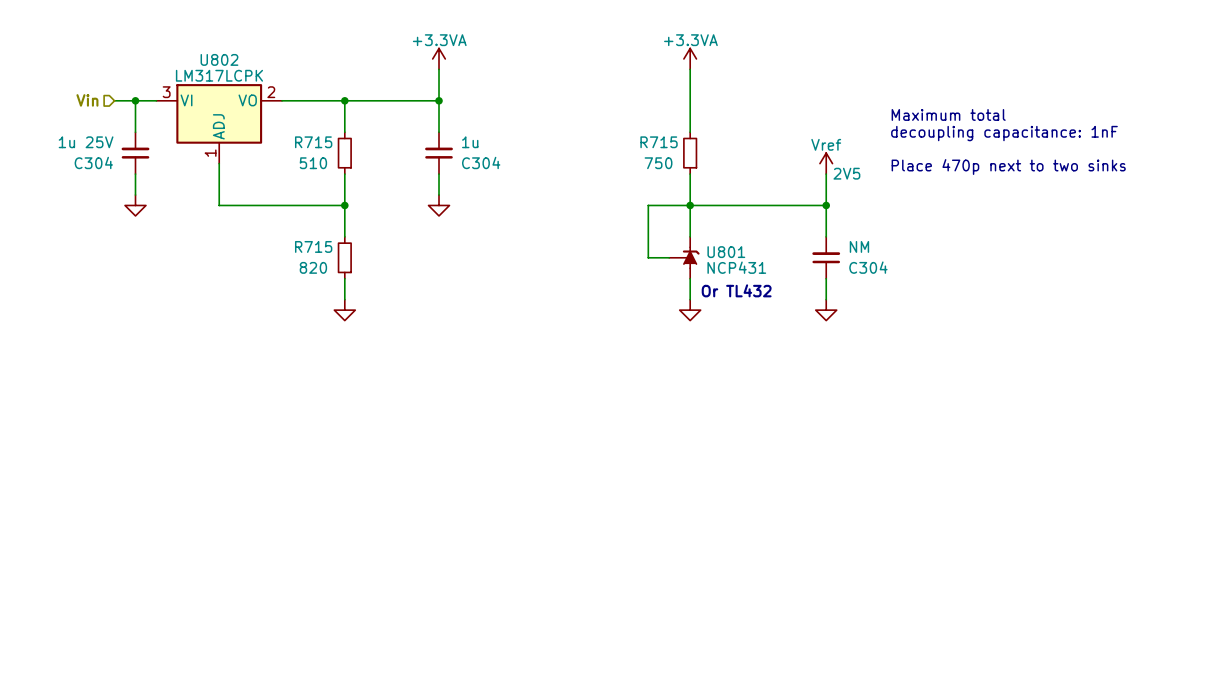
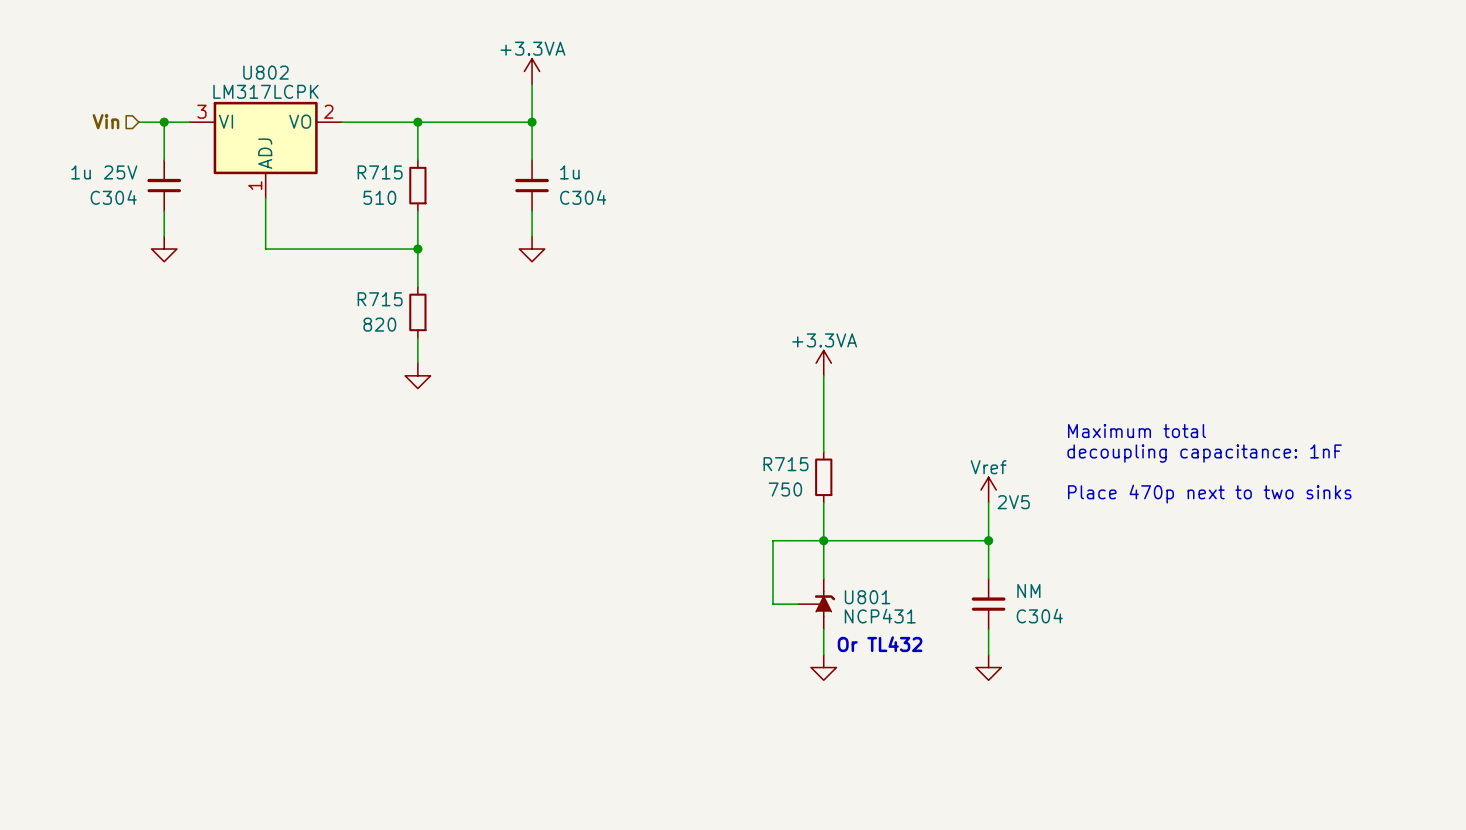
power symbol: +3.3VA (690, 58) -> none
wire: (690, 69) (690, 132) -> none
text: Maximum total (948, 114) -> none
text: decoupling capacitance: 1nF (1004, 133) -> none
R715: 750 (690, 153) -> none
power symbol: Vref (826, 163) -> none
text: Place 470p next to two sinks (1008, 167) -> none
wire: (690, 174) (690, 236) -> (823, 375) (823, 451)
wire: (826, 174) (826, 236) -> none
junction: (690, 205) -> none
wire: (826, 205) (648, 205) (648, 257) (669, 257) -> none
junction: (826, 205) -> none
U801 position: (684, 257) -> (816, 604)
C304: NM (826, 257) -> none
wire: (690, 278) (690, 299) -> none
wire: (826, 278) (826, 299) -> none
text: Or TL432 (736, 290) -> none
power symbol: none -> +3.3VA (823, 363)
power symbol: (690, 310) -> none
power symbol: (826, 310) -> none
text: none -> Maximum total (1136, 431)
text: none -> decoupling capacitance: 1nF (1204, 453)
R715: none -> 750 (823, 477)
power symbol: none -> Vref (988, 489)
text: none -> Place 470p next to two sinks (1209, 494)
wire: none -> (823, 502) (823, 578)
wire: none -> (988, 502) (988, 578)
junction: none -> (823, 540)
wire: none -> (988, 540) (773, 540) (773, 604) (798, 604)
junction: none -> (988, 540)
C304: none -> NM (988, 604)
wire: none -> (823, 629) (823, 654)
wire: none -> (988, 629) (988, 654)
text: none -> Or TL432 (880, 644)
power symbol: none -> (823, 667)
power symbol: none -> (988, 667)

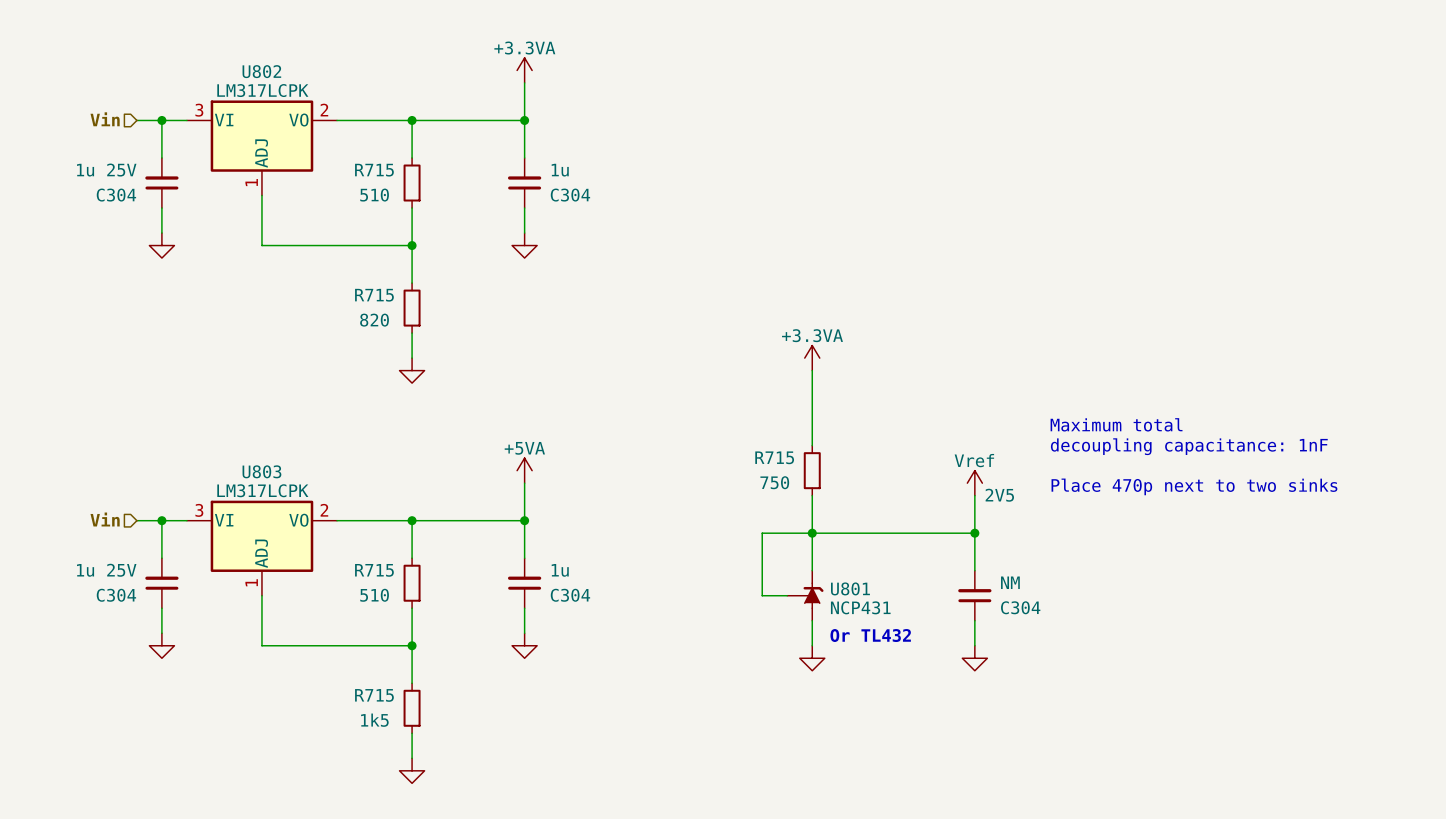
power symbol: none -> +5VA (524, 470)
wire: none -> (524, 483) (524, 558)
hierarchical label: none -> Vin (105, 519)
wire: none -> (136, 520) (186, 520)
wire: none -> (161, 520) (161, 558)
junction: none -> (161, 520)
wire: none -> (337, 520) (524, 520)
wire: none -> (412, 520) (412, 558)
junction: none -> (412, 520)
junction: none -> (524, 520)
U803: none -> LM317LCPK (261, 548)
C304: none -> 1u 25V (161, 583)
R715: none -> 510 (412, 583)
C304: none -> 1u (524, 583)
wire: none -> (261, 595) (261, 645) (412, 645)
wire: none -> (161, 608) (161, 633)
wire: none -> (412, 608) (412, 683)
wire: none -> (524, 608) (524, 633)
power symbol: none -> (161, 645)
junction: none -> (412, 645)
power symbol: none -> (524, 645)
R715: none -> 1k5 (412, 708)
wire: none -> (412, 733) (412, 758)
power symbol: none -> (412, 770)

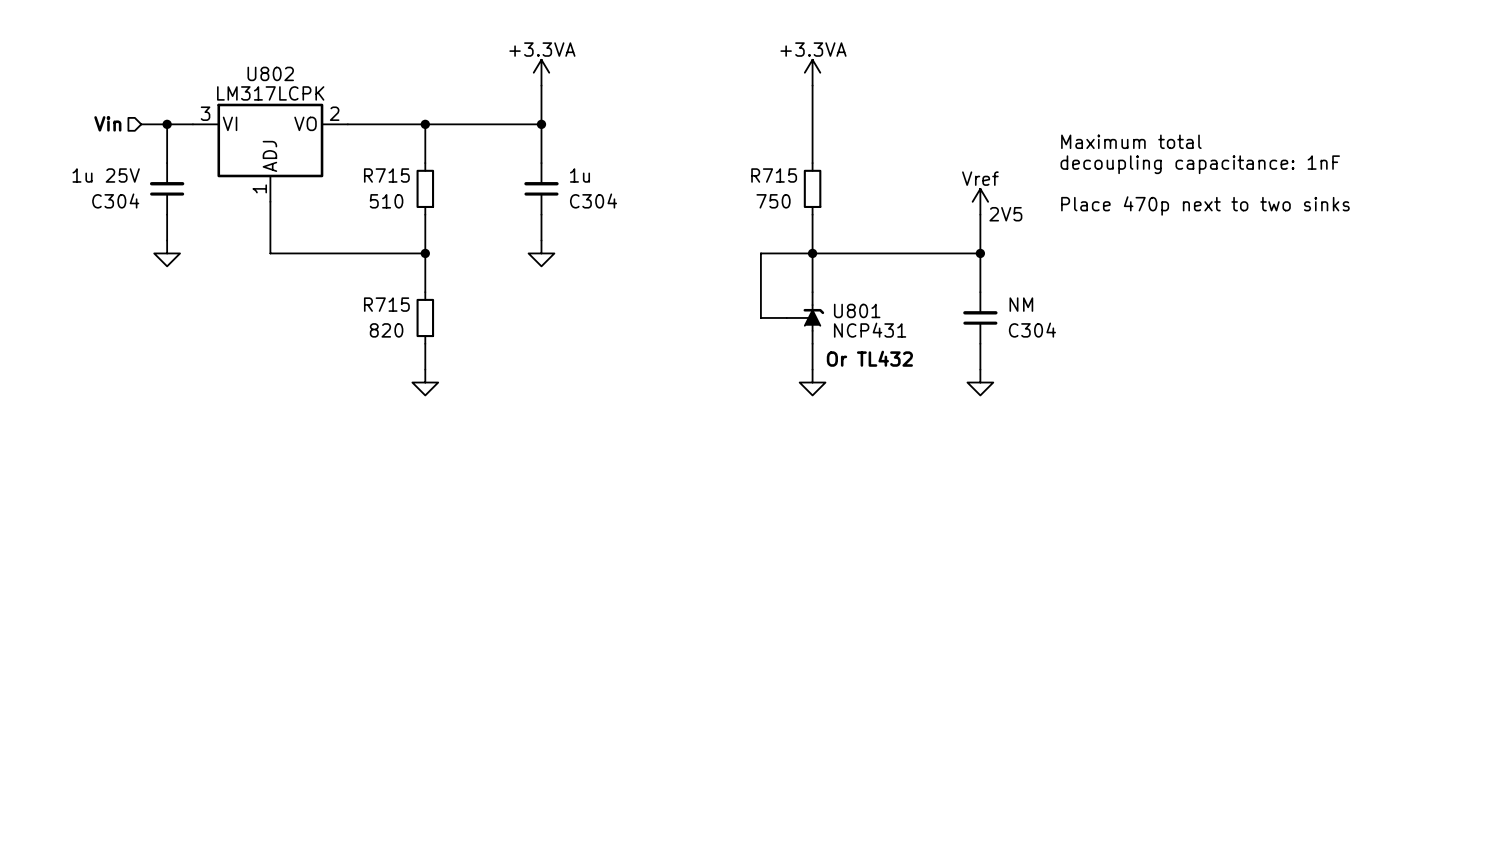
power symbol: none -> +3.3VA (812, 72)
wire: none -> (812, 85) (812, 163)
text: none -> Maximum total (1131, 141)
text: none -> decoupling capacitance: 1nF (1200, 164)
R715: none -> 750 (812, 188)
power symbol: none -> Vref (980, 201)
text: none -> Place 470p next to two sinks (1205, 205)
wire: none -> (980, 214) (980, 292)
junction: none -> (812, 253)
wire: none -> (980, 253) (760, 253) (760, 317) (786, 317)
junction: none -> (980, 253)
C304: none -> NM (980, 317)
wire: none -> (812, 343) (812, 369)
wire: none -> (980, 343) (980, 369)
text: none -> Or TL432 (869, 358)
power symbol: +3.3VA (812, 358) -> none
power symbol: none -> (812, 382)
wire: (812, 370) (812, 445) -> (812, 214) (812, 292)
power symbol: none -> (980, 382)
text: Maximum total (1116, 424) -> none
text: decoupling capacitance: 1nF (1189, 446) -> none
power symbol: +5VA (524, 470) -> none
R715: 750 (812, 470) -> none
wire: (524, 483) (524, 558) -> none
power symbol: Vref (974, 483) -> none
text: Place 470p next to two sinks (1194, 486) -> none
wire: (812, 495) (812, 570) -> none
wire: (974, 495) (974, 570) -> none
hierarchical label: Vin (105, 519) -> none
wire: (136, 520) (186, 520) -> none
wire: (161, 520) (161, 558) -> none
junction: (161, 520) -> none
wire: (337, 520) (524, 520) -> none
wire: (412, 520) (412, 558) -> none
junction: (412, 520) -> none
junction: (524, 520) -> none
junction: (812, 533) -> none
wire: (974, 533) (762, 533) (762, 595) (787, 595) -> none
junction: (974, 533) -> none
U803: LM317LCPK (261, 548) -> none
C304: 1u 25V (161, 583) -> none
R715: 510 (412, 583) -> none
C304: 1u (524, 583) -> none
wire: (261, 595) (261, 645) (412, 645) -> none
U801 position: (805, 595) -> (805, 317)
C304: NM (974, 595) -> none
wire: (161, 608) (161, 633) -> none
wire: (412, 608) (412, 683) -> none
wire: (524, 608) (524, 633) -> none
wire: (812, 620) (812, 645) -> none
wire: (974, 620) (974, 645) -> none
text: Or TL432 (870, 635) -> none
power symbol: (161, 645) -> none
junction: (412, 645) -> none
power symbol: (524, 645) -> none
power symbol: (812, 658) -> none
power symbol: (974, 658) -> none
R715: 1k5 (412, 708) -> none
wire: (412, 733) (412, 758) -> none
power symbol: (412, 770) -> none

